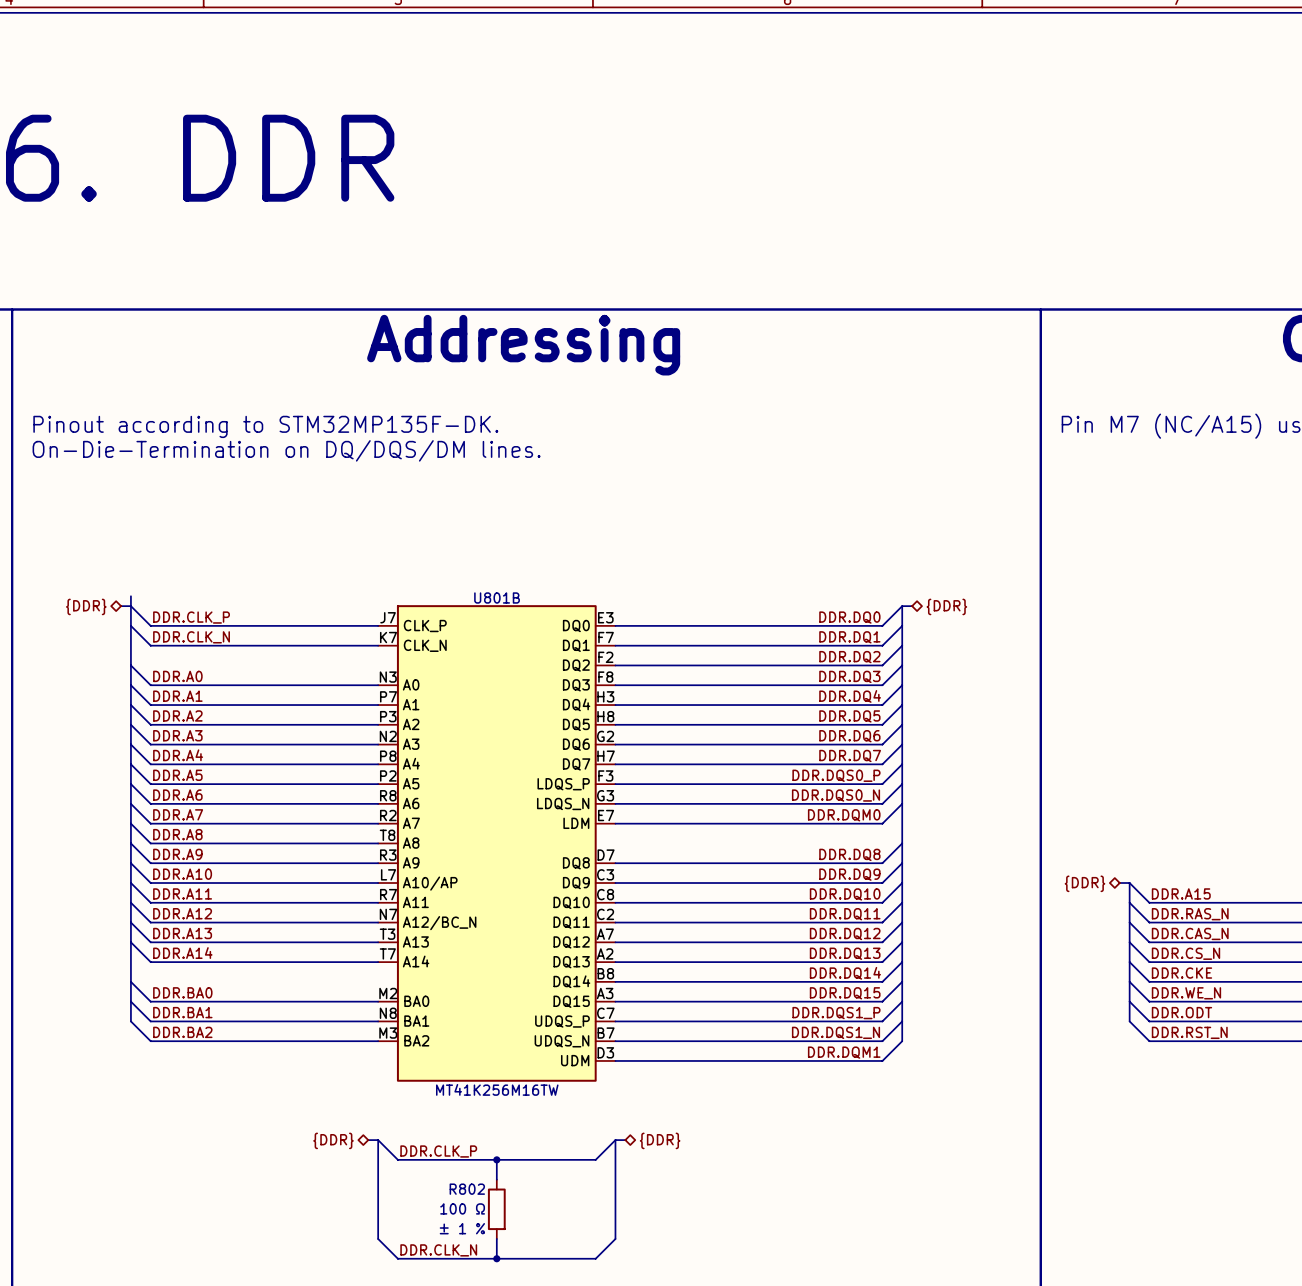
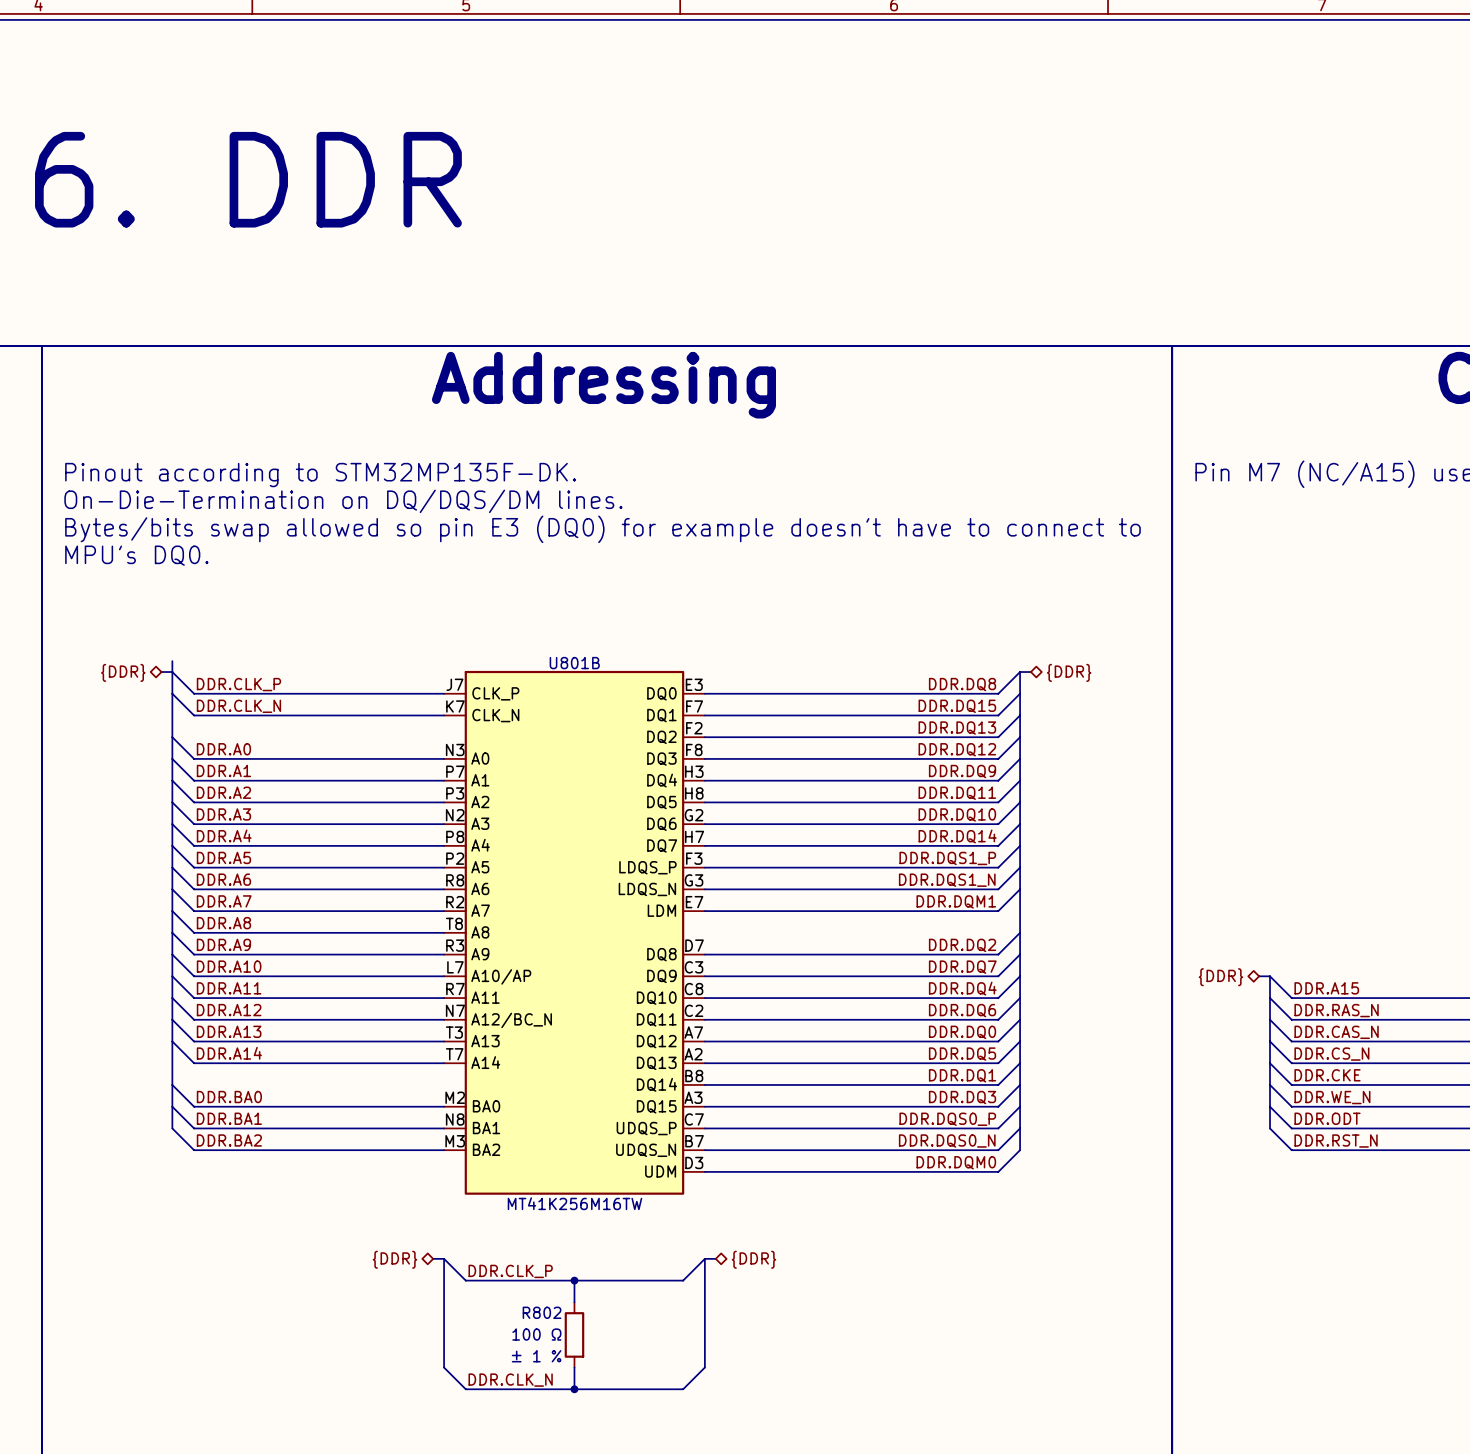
text: none -> Bytes/bits swap allowed so pin E3 (DQ0) for example doesn't have to connect to (602, 529)
text: none -> MPU's DQ0. (136, 555)
label: DDR.DQ0 (849, 617) -> DDR.DQ8 (962, 684)
label: DDR.DQ1 (849, 637) -> DDR.DQ15 (957, 706)
label: DDR.DQ2 (849, 657) -> DDR.DQ13 (957, 728)
label: DDR.DQ3 (849, 676) -> DDR.DQ12 (957, 749)
label: DDR.DQ4 (850, 696) -> DDR.DQ9 (962, 771)
label: DDR.DQ5 (849, 716) -> DDR.DQ11 (957, 793)
label: DDR.DQ6 (849, 736) -> DDR.DQ10 (957, 814)
label: DDR.DQ7 (850, 755) -> DDR.DQ14 (957, 836)
label: DDR.DQS0_P (836, 775) -> DDR.DQS1_P (947, 858)
label: DDR.DQS0_N (835, 795) -> DDR.DQS1_N (947, 880)
label: DDR.DQM0 (844, 815) -> DDR.DQM1 (956, 901)
label: DDR.DQ8 (849, 854) -> DDR.DQ2 (962, 945)
label: DDR.DQ9 (849, 874) -> DDR.DQ7 (962, 967)
label: DDR.DQ10 (845, 894) -> DDR.DQ4 (962, 988)
label: DDR.DQ11 (845, 914) -> DDR.DQ6 (962, 1010)
label: DDR.DQ12 (845, 933) -> DDR.DQ0 (962, 1032)
label: DDR.DQ13 (845, 953) -> DDR.DQ5 (962, 1054)
label: DDR.DQ14 (845, 973) -> DDR.DQ1 (962, 1075)
label: DDR.DQ15 (845, 993) -> DDR.DQ3 (962, 1097)
label: DDR.DQS1_P (836, 1013) -> DDR.DQS0_P (947, 1119)
label: DDR.DQS1_N (835, 1032) -> DDR.DQS0_N (947, 1141)
label: DDR.DQM1 (844, 1052) -> DDR.DQM0 (956, 1162)

